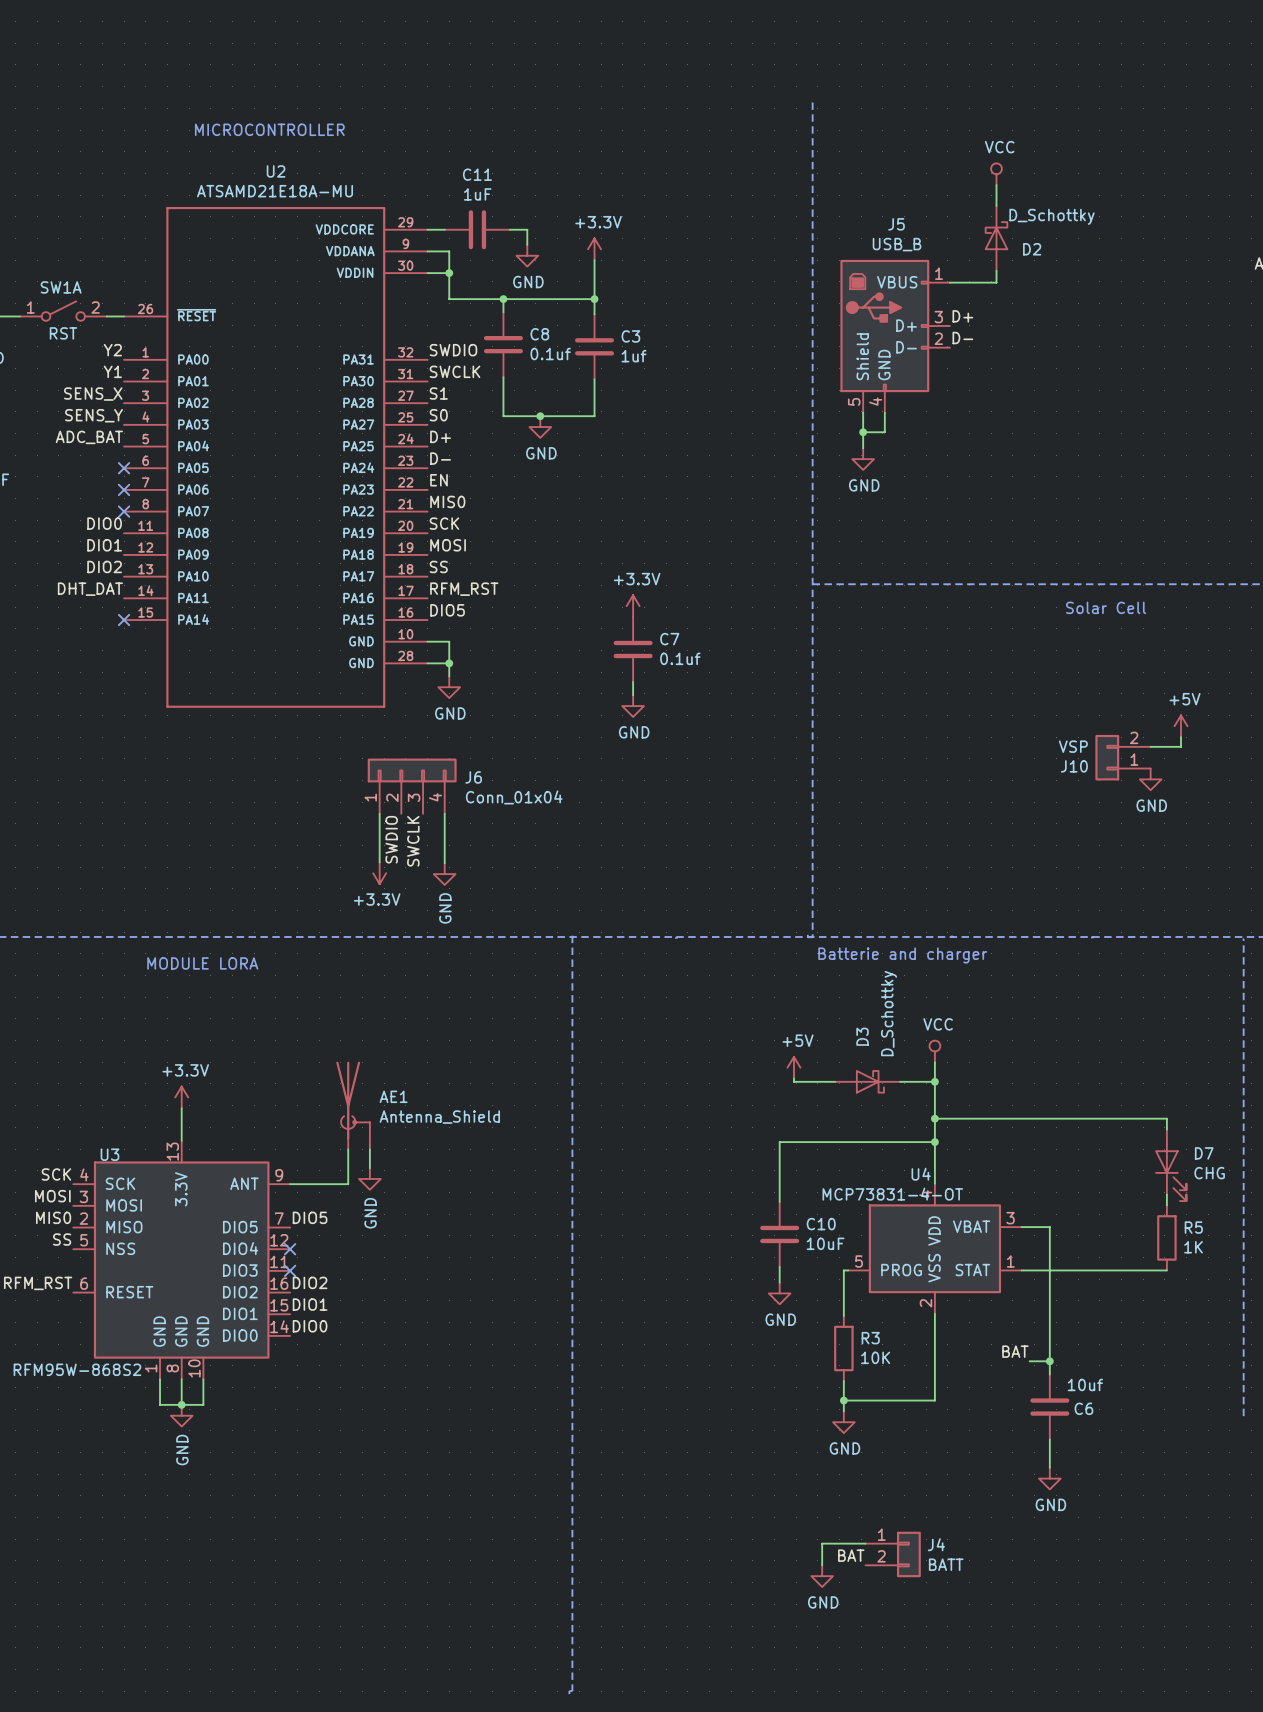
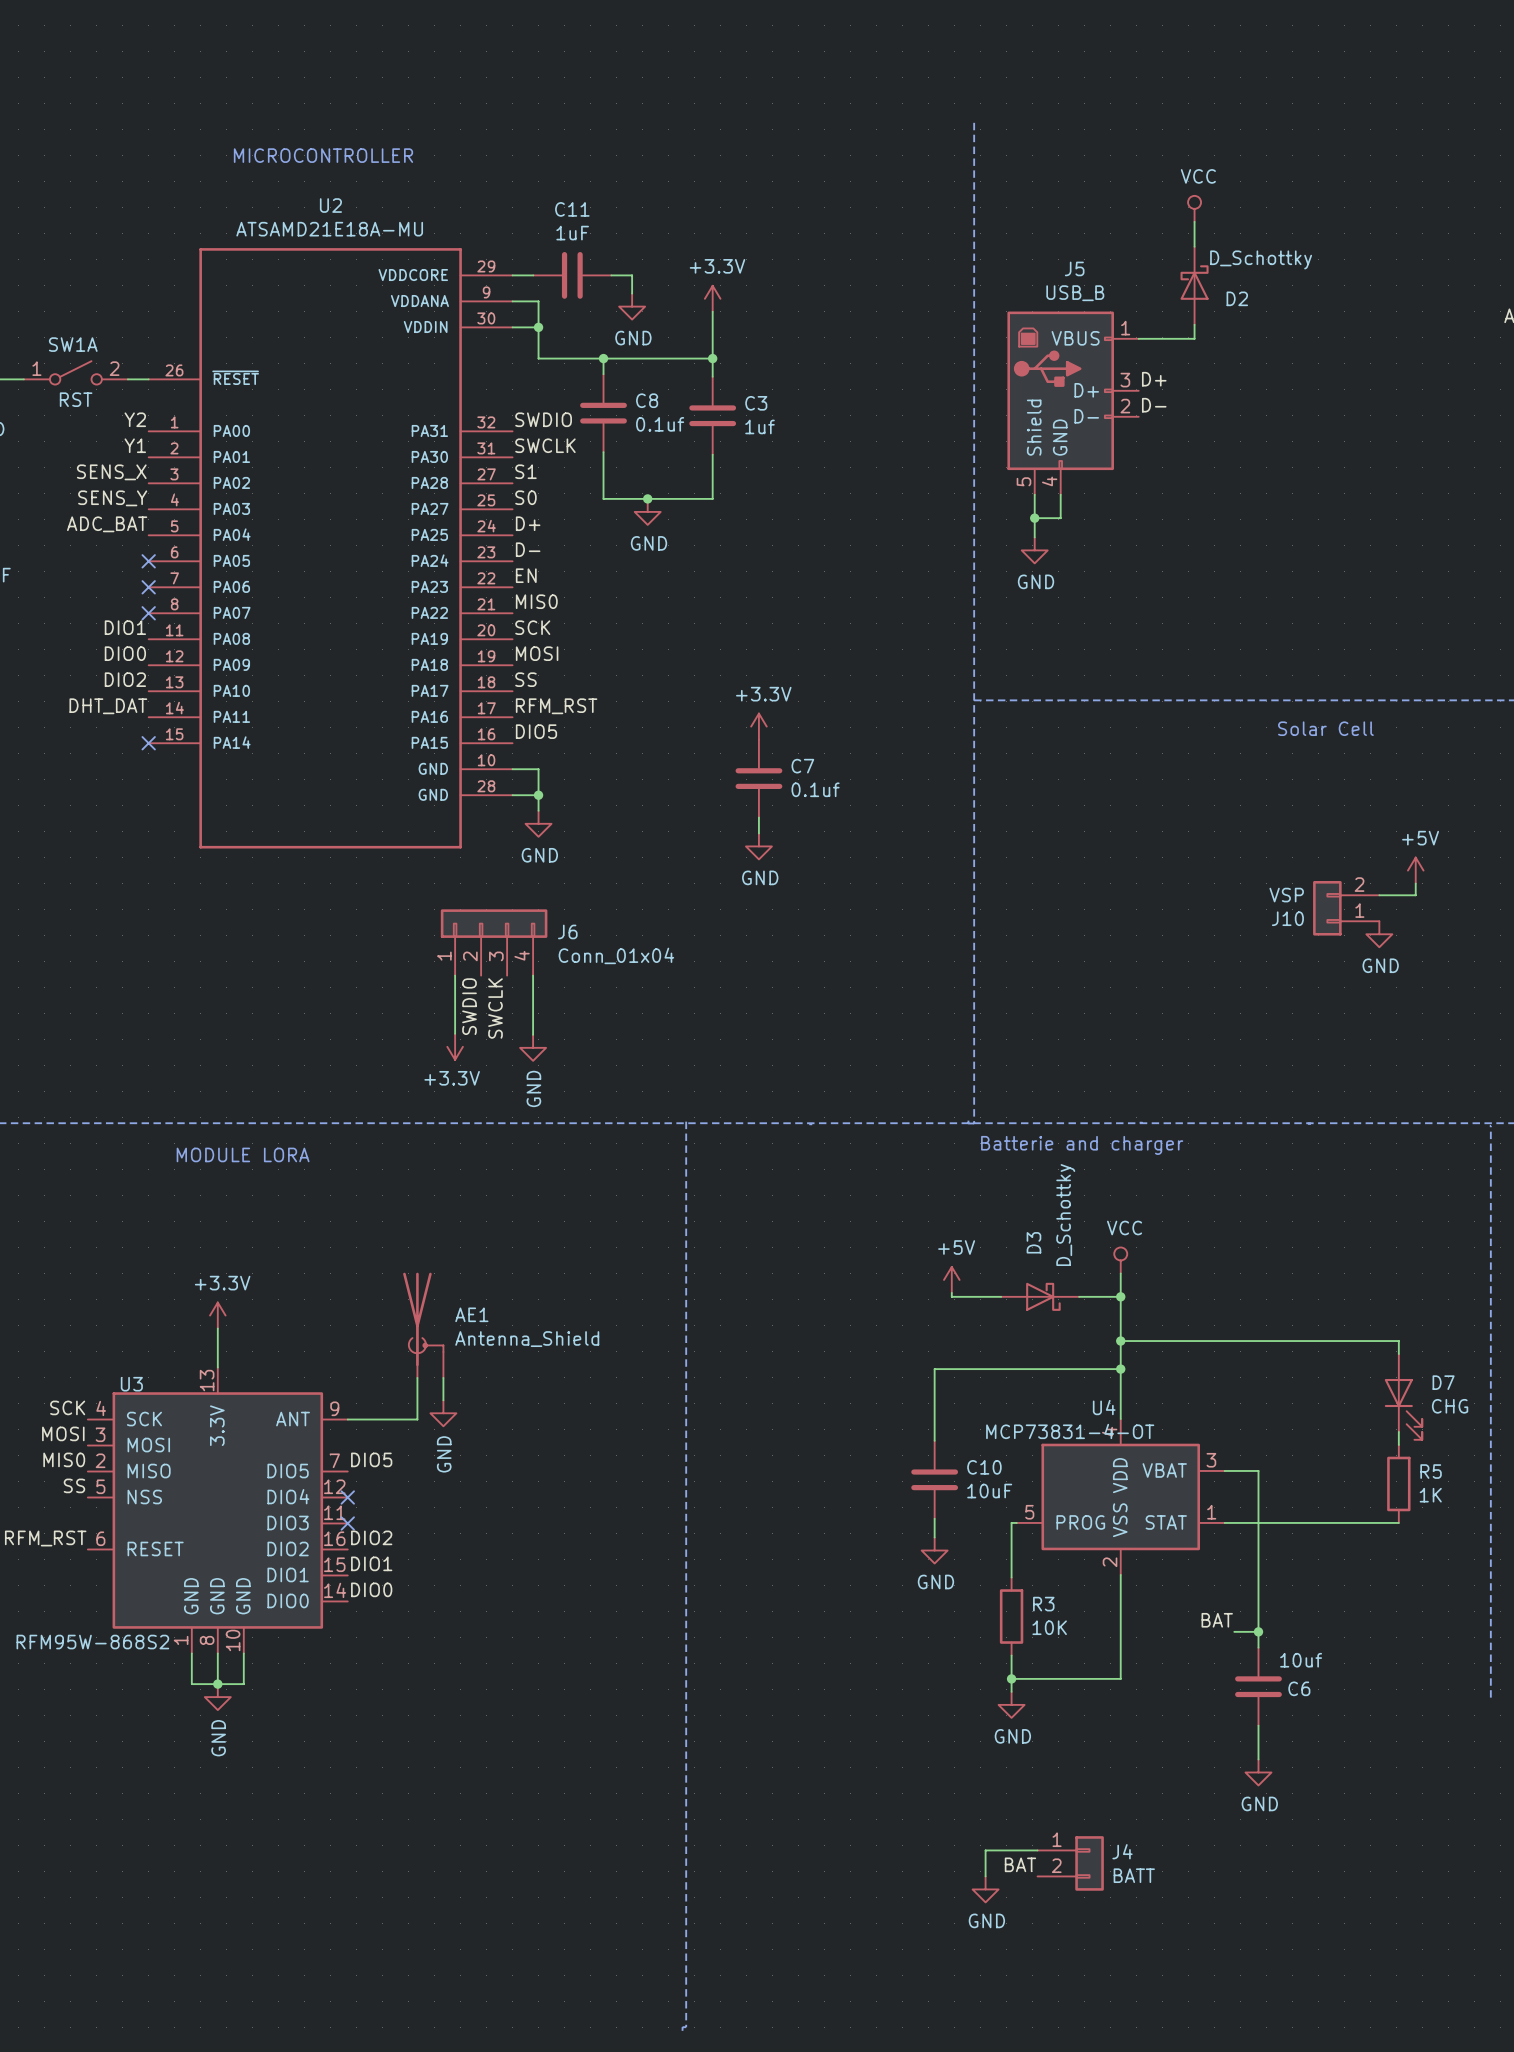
label: DIO0 (104, 523) -> DIO1 (125, 627)
label: DIO1 (104, 545) -> DIO0 (125, 653)

